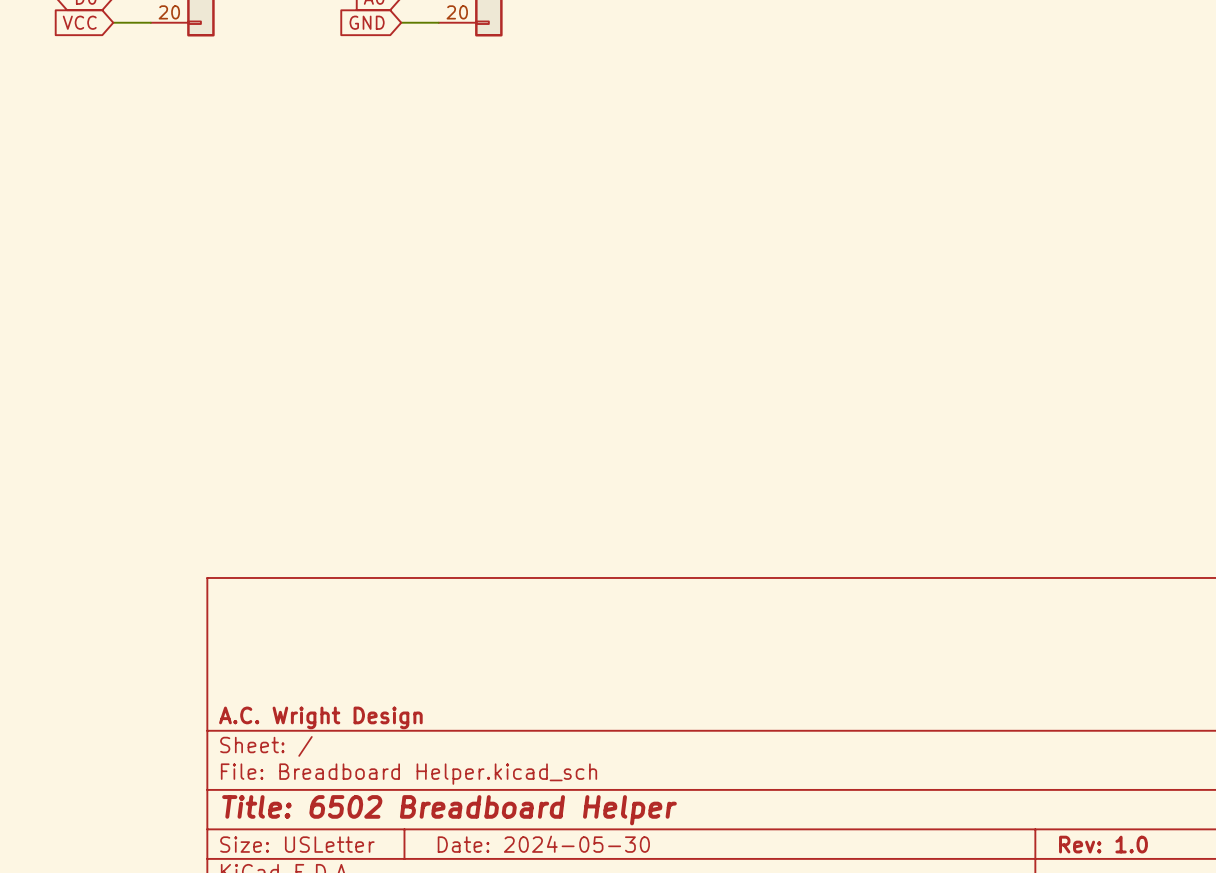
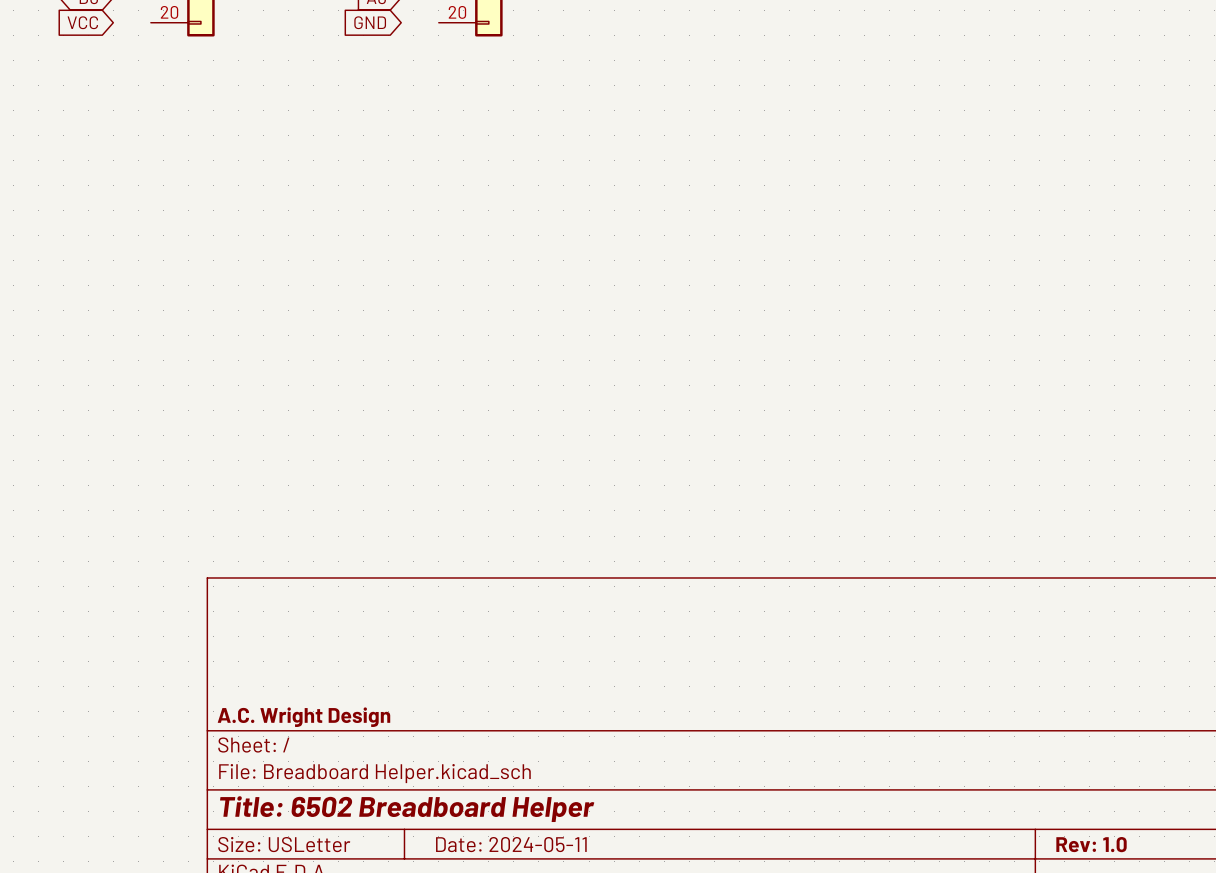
wire: (113, 22) (150, 22) -> none
wire: (401, 22) (438, 22) -> none
title block: Date: 2024-05-30 (543, 844) -> Date: 2024-05-11 (511, 844)

